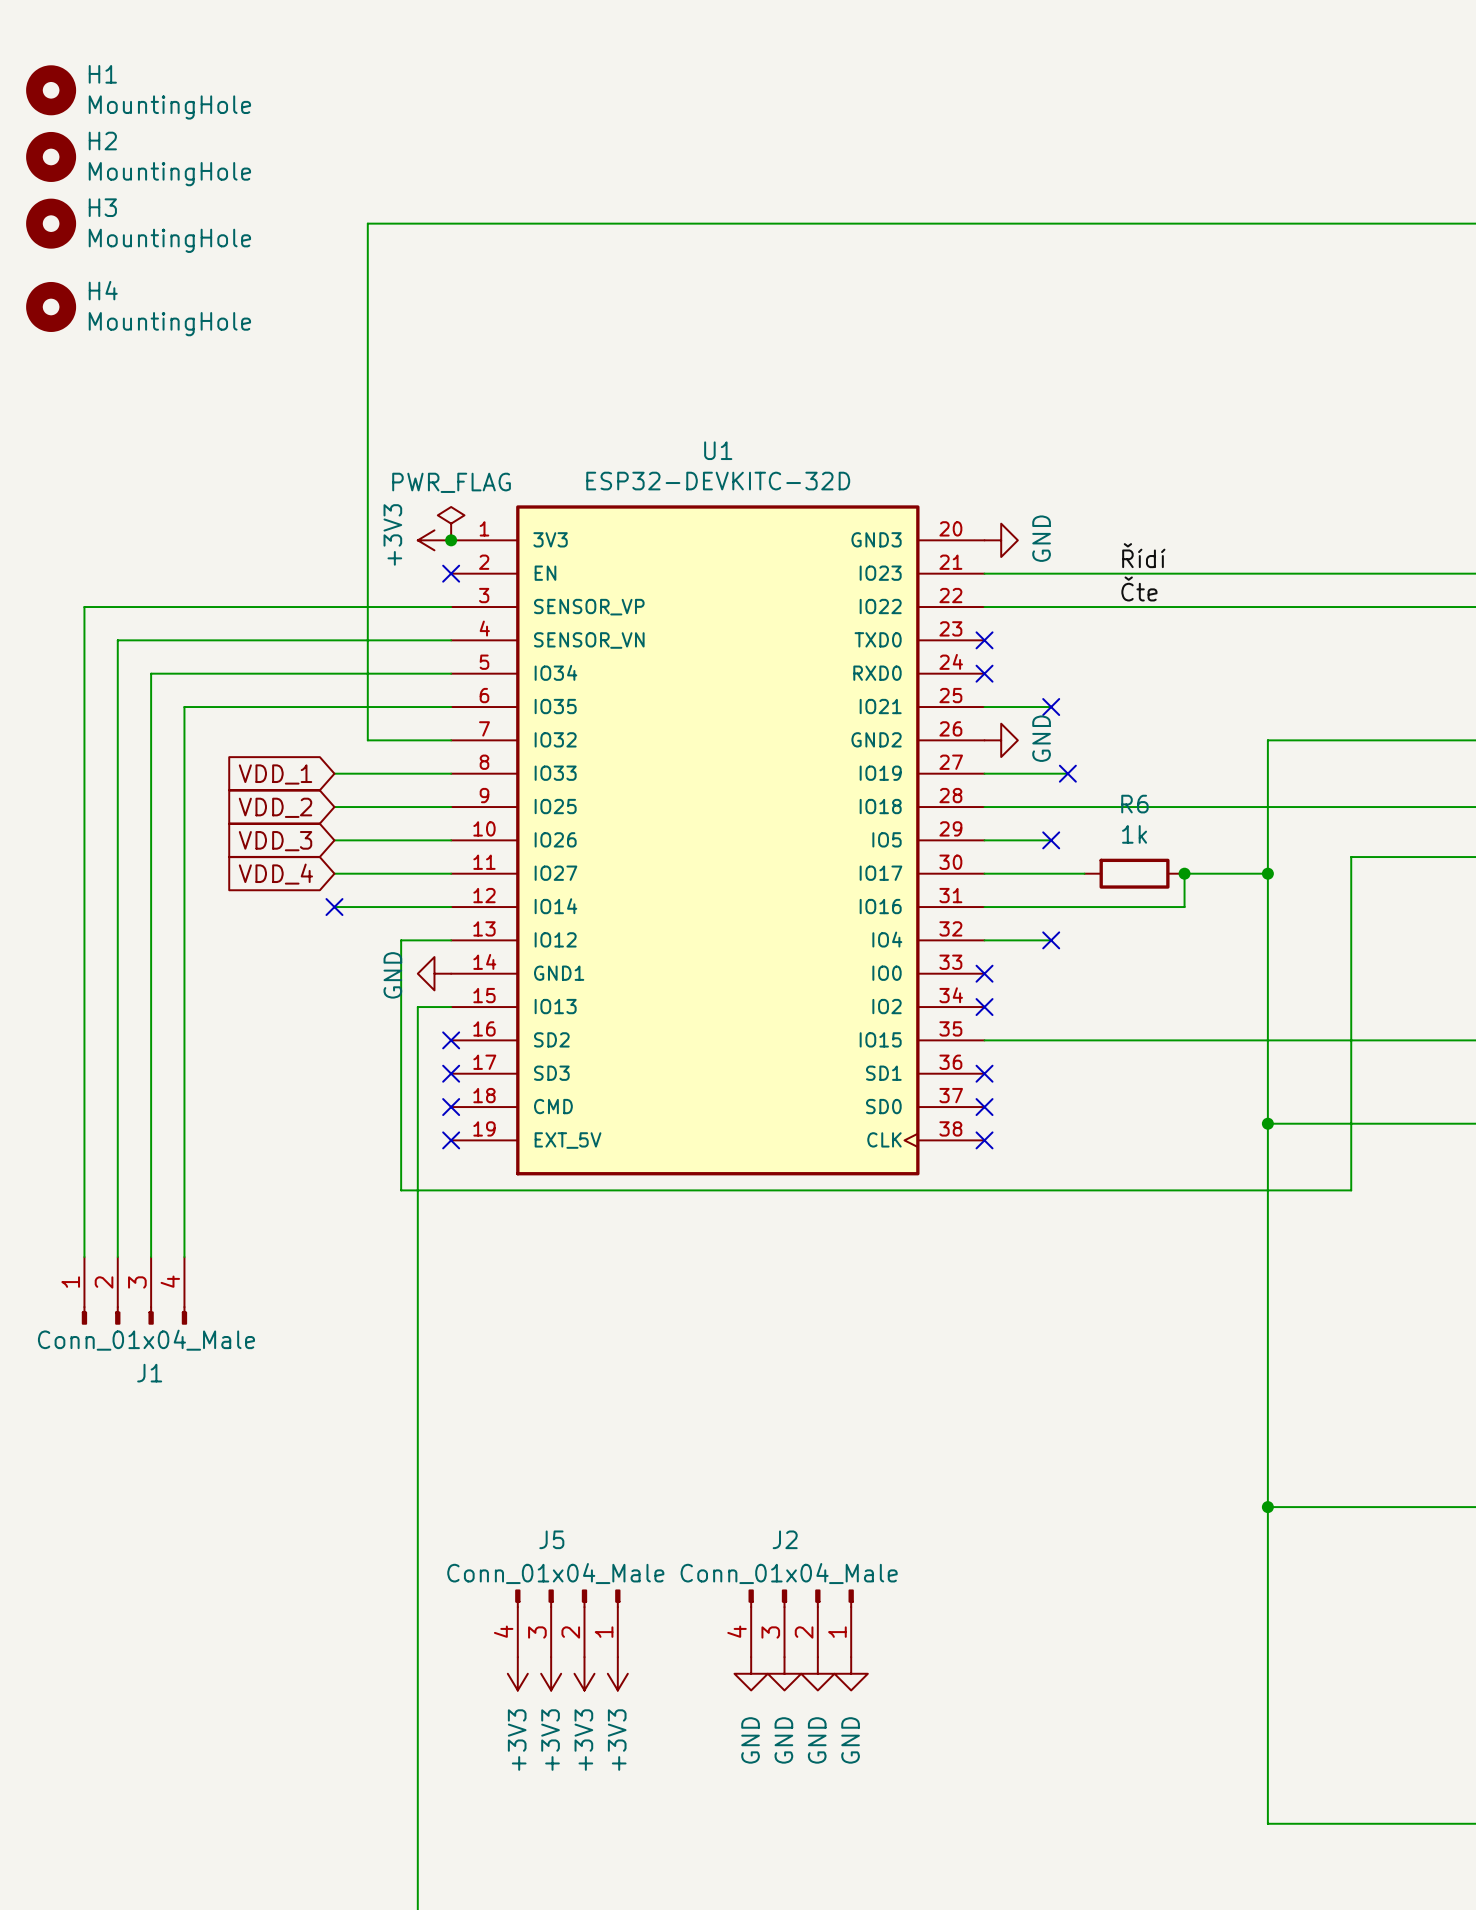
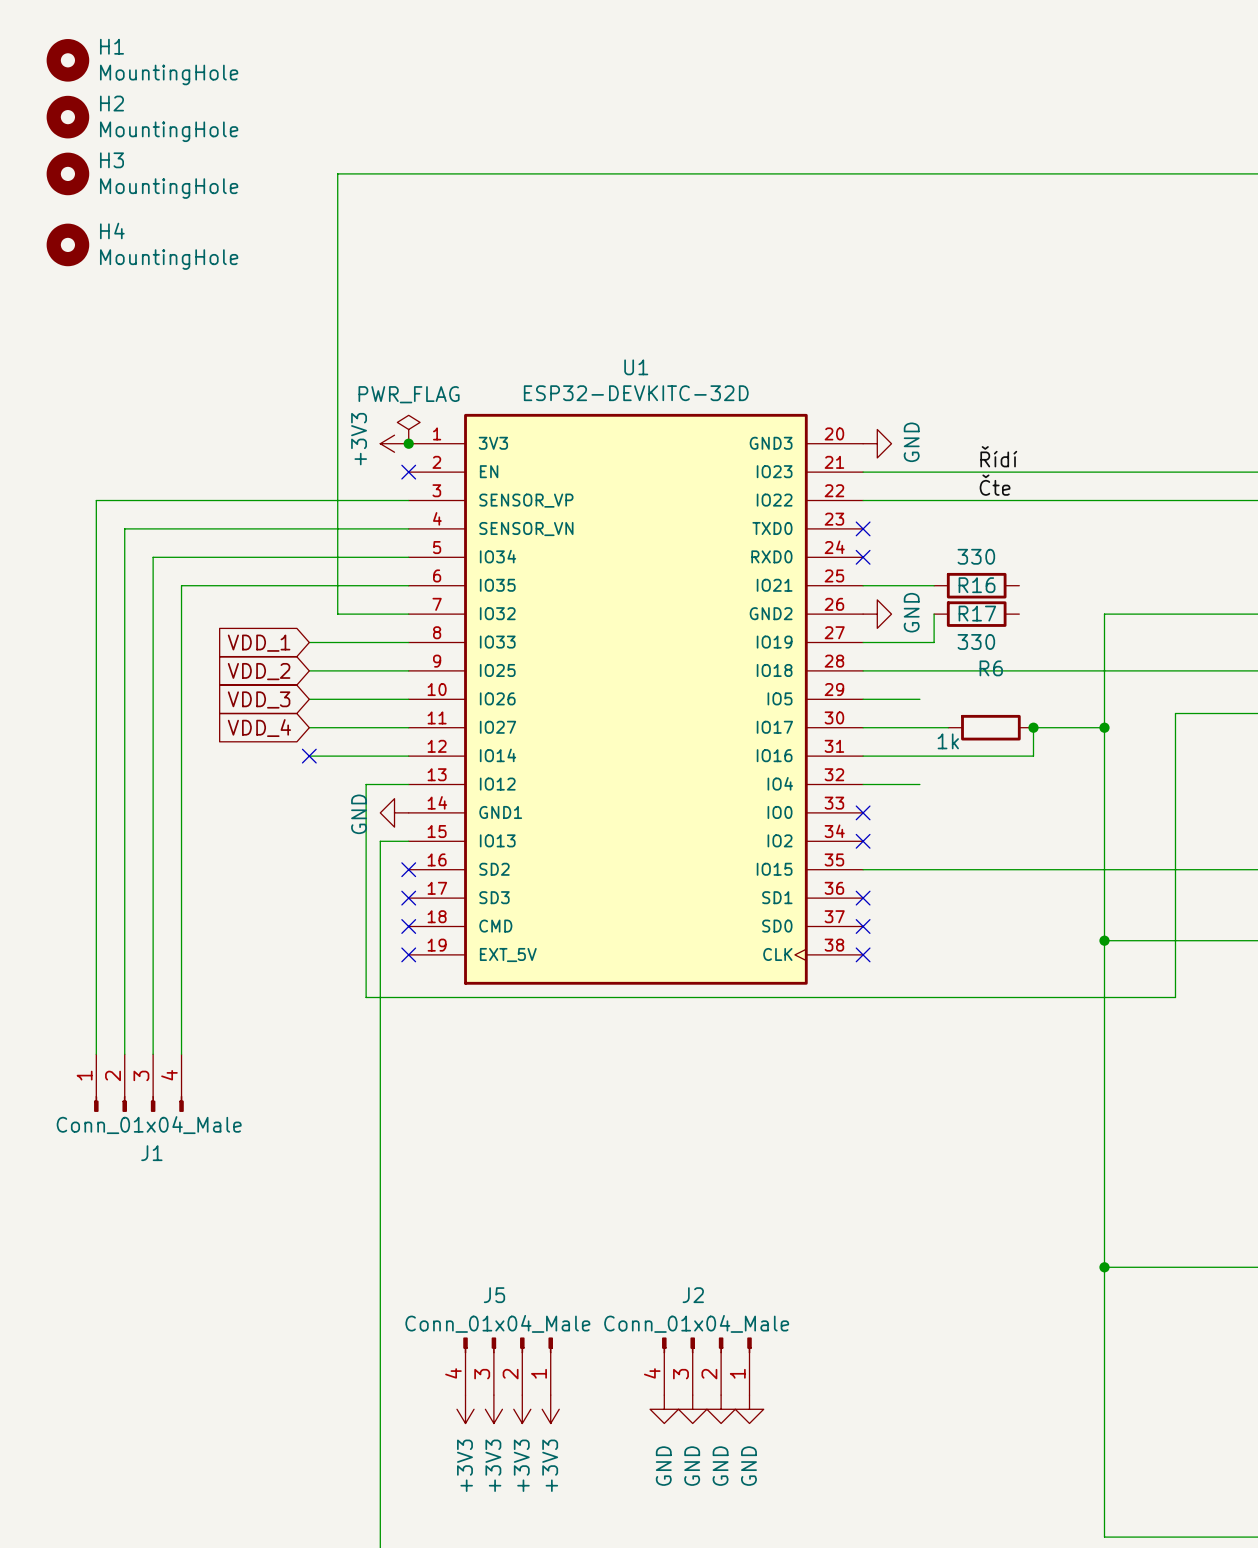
wire: none -> (919, 585) (934, 585)
no-connect mark: (1051, 707) -> none
R16: none -> 330 (976, 585)
wire: none -> (934, 614) (934, 642)
R17: none -> 330 (976, 614)
no-connect mark: (1067, 773) -> none
R6 value position: 1k (1134, 834) -> 1k (948, 741)
no-connect mark: (1051, 840) -> none
no-connect mark: (1051, 940) -> none

